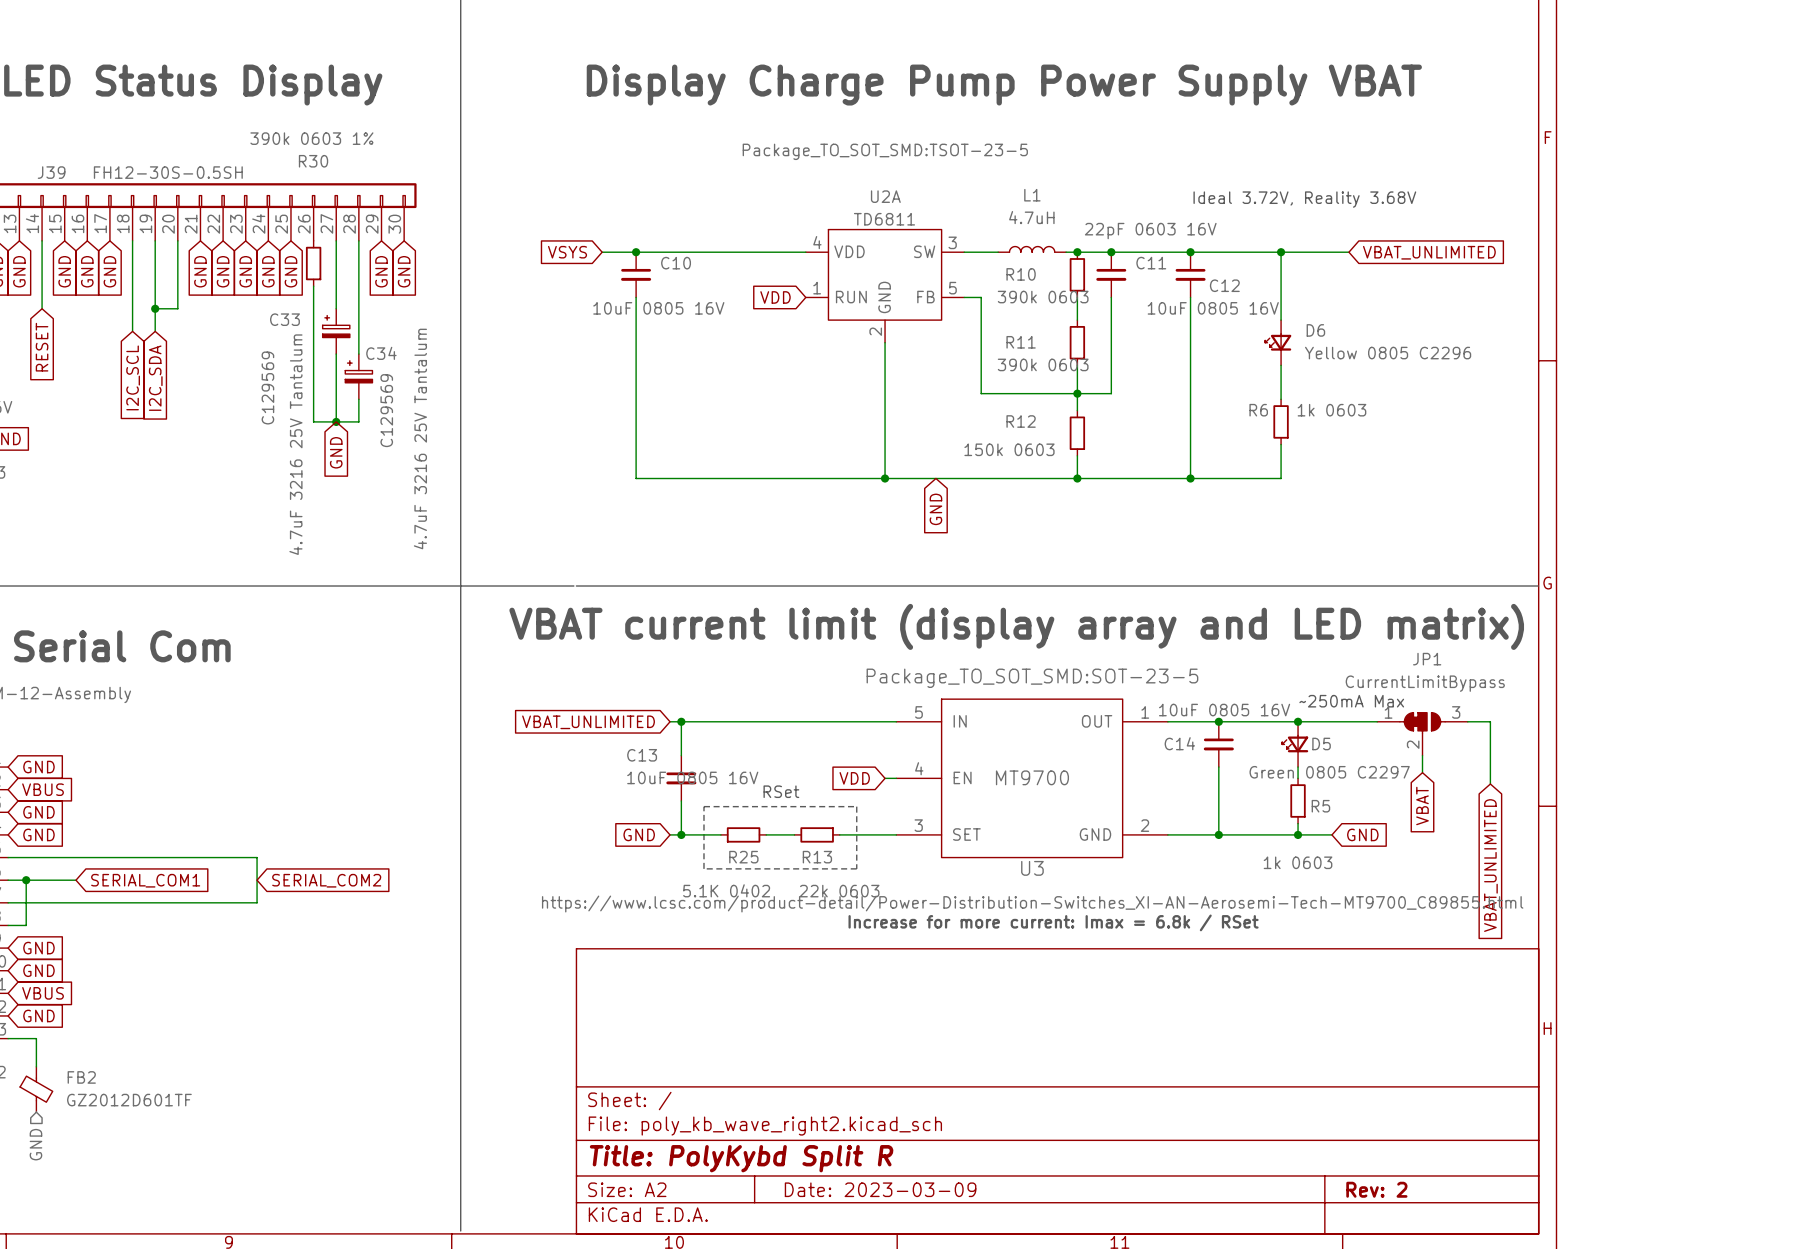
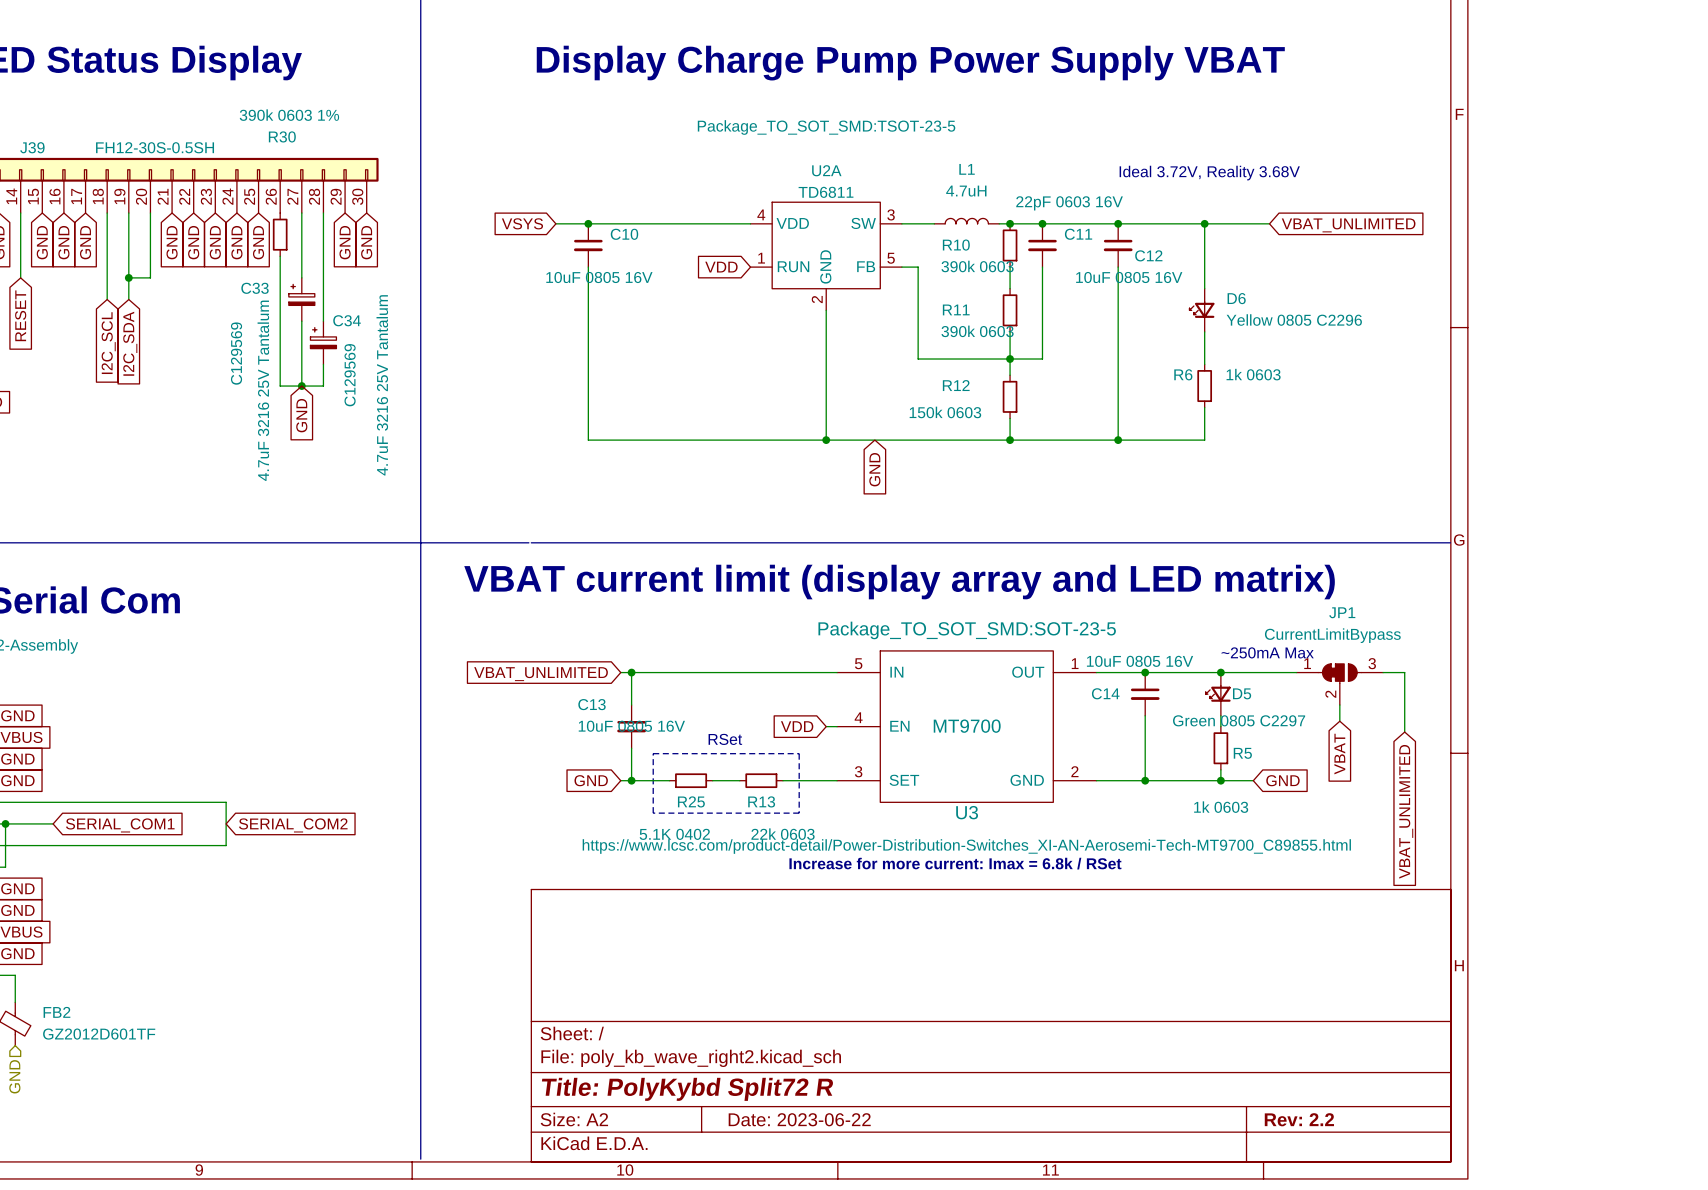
title block: Title: PolyKybd Split R (741, 1158) -> Title: PolyKybd Split72 R (687, 1089)
title block: Date: 2023-03-09 (880, 1189) -> Date: 2023-06-22 (799, 1119)
title block: Rev: 2 (1376, 1189) -> Rev: 2.2 (1299, 1119)

